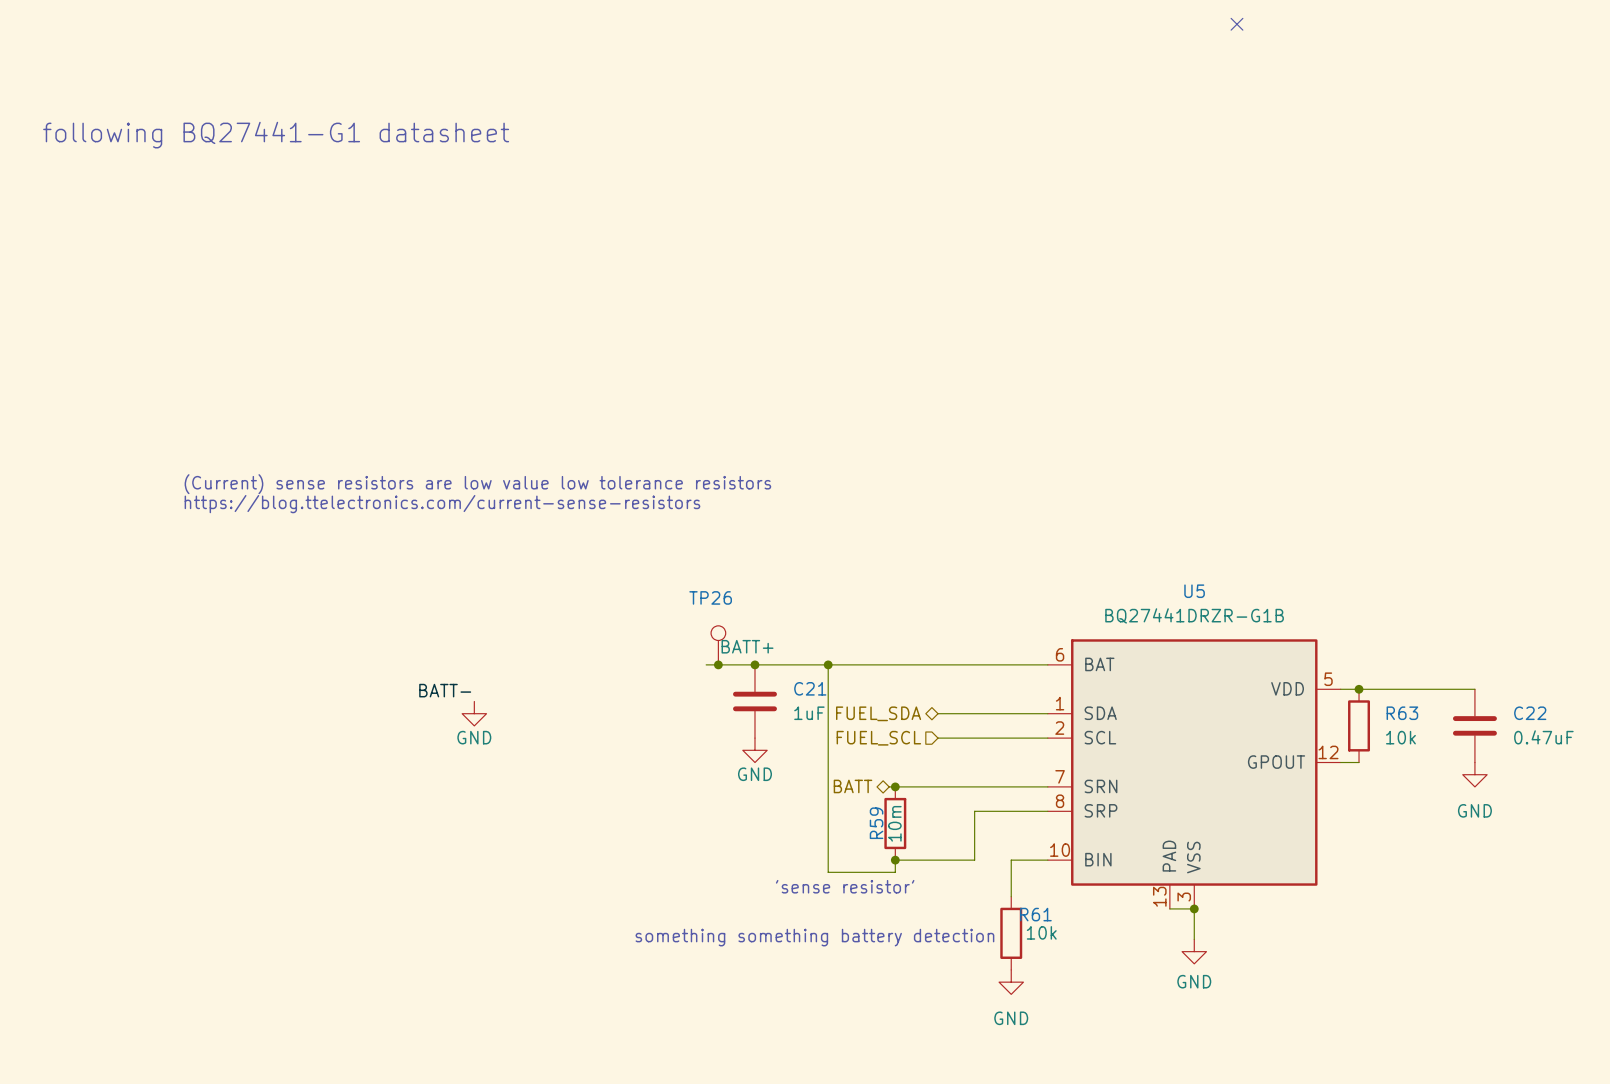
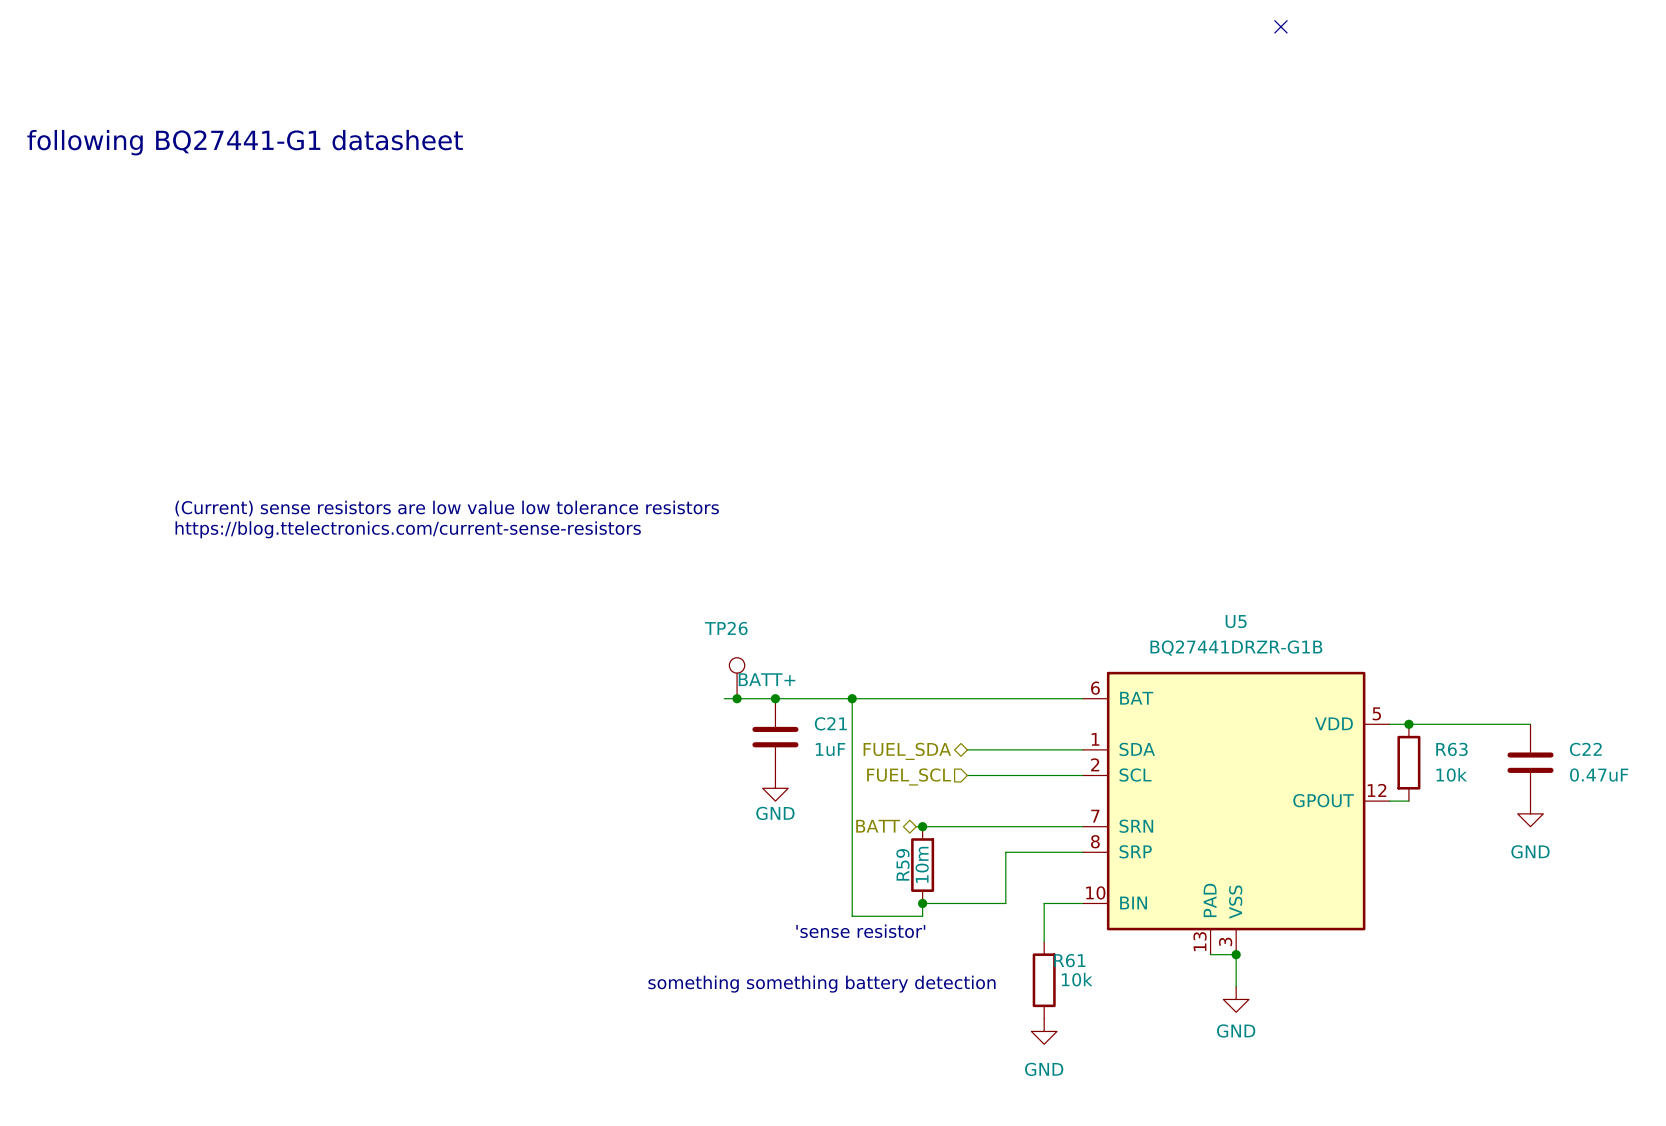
label: BATT- (445, 690) -> none
power symbol: GND (474, 713) -> none

